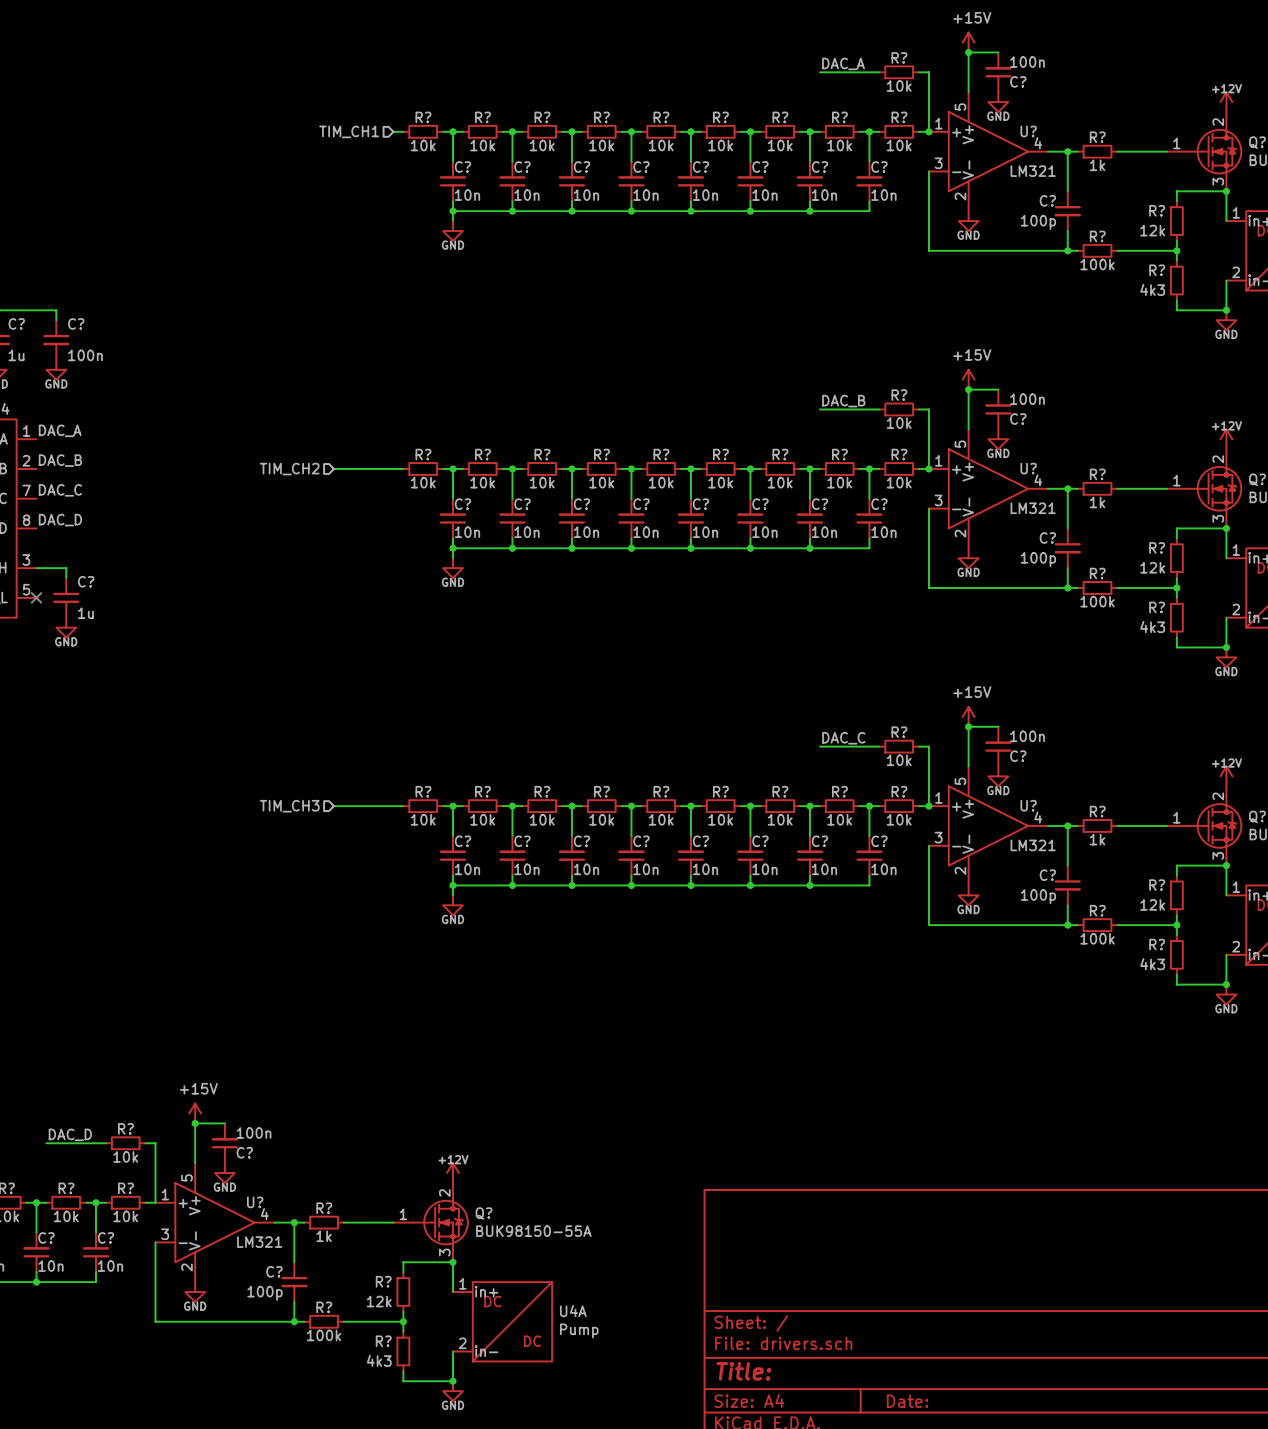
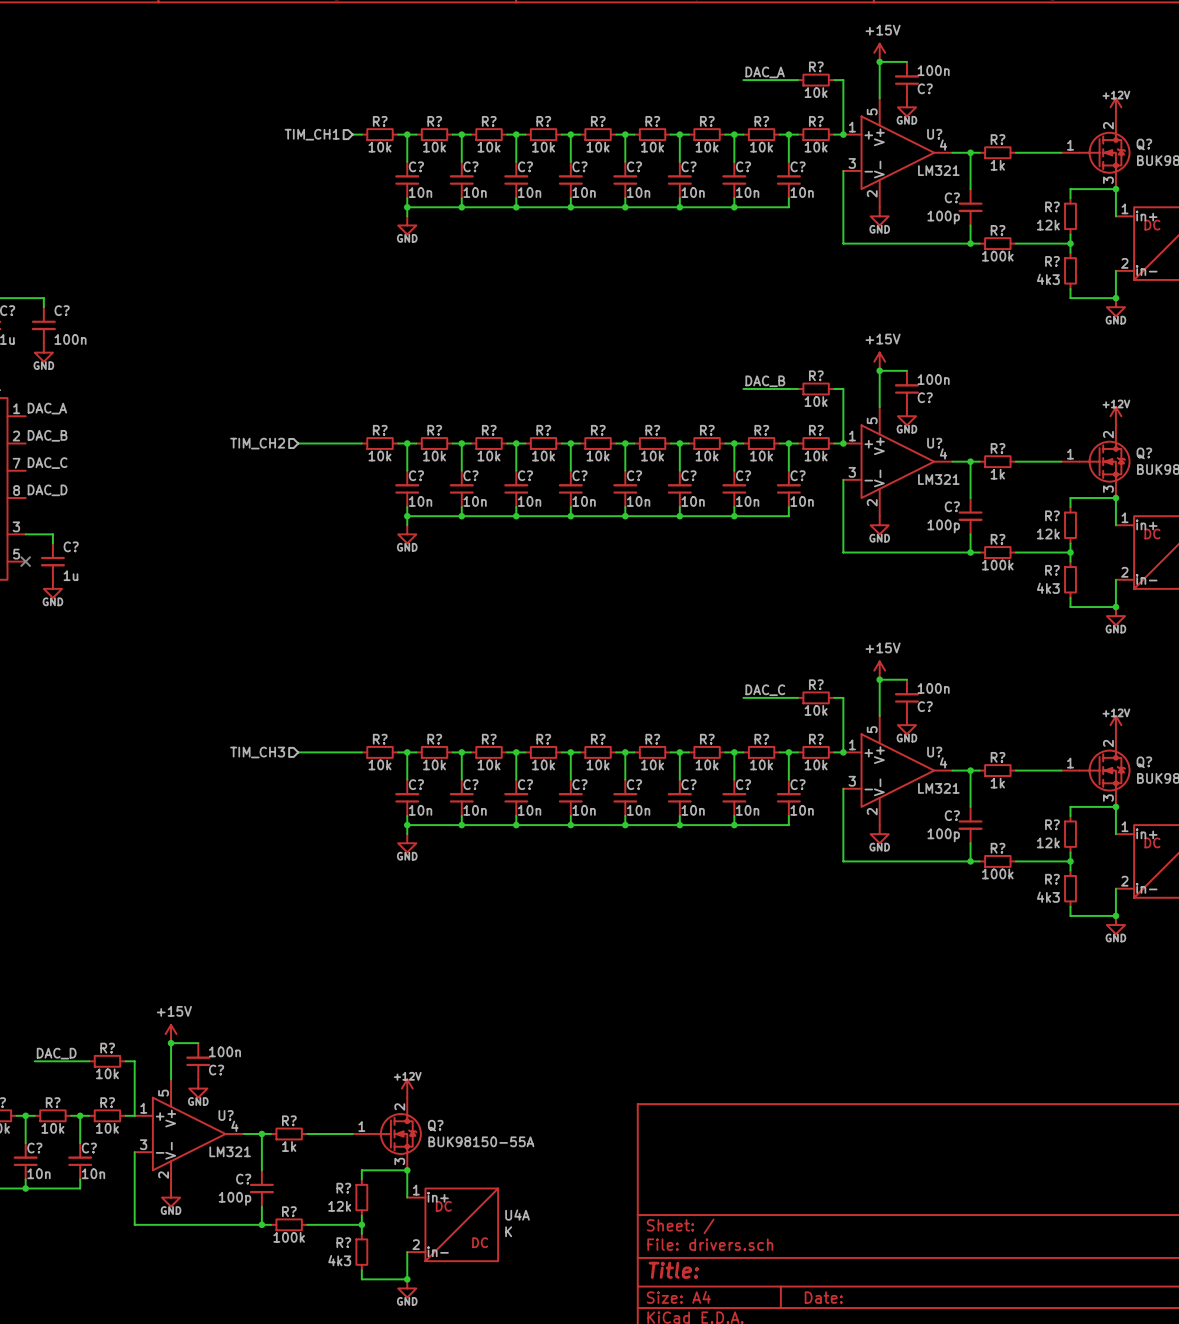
U4A value: Pump (579, 1330) -> K (508, 1231)

